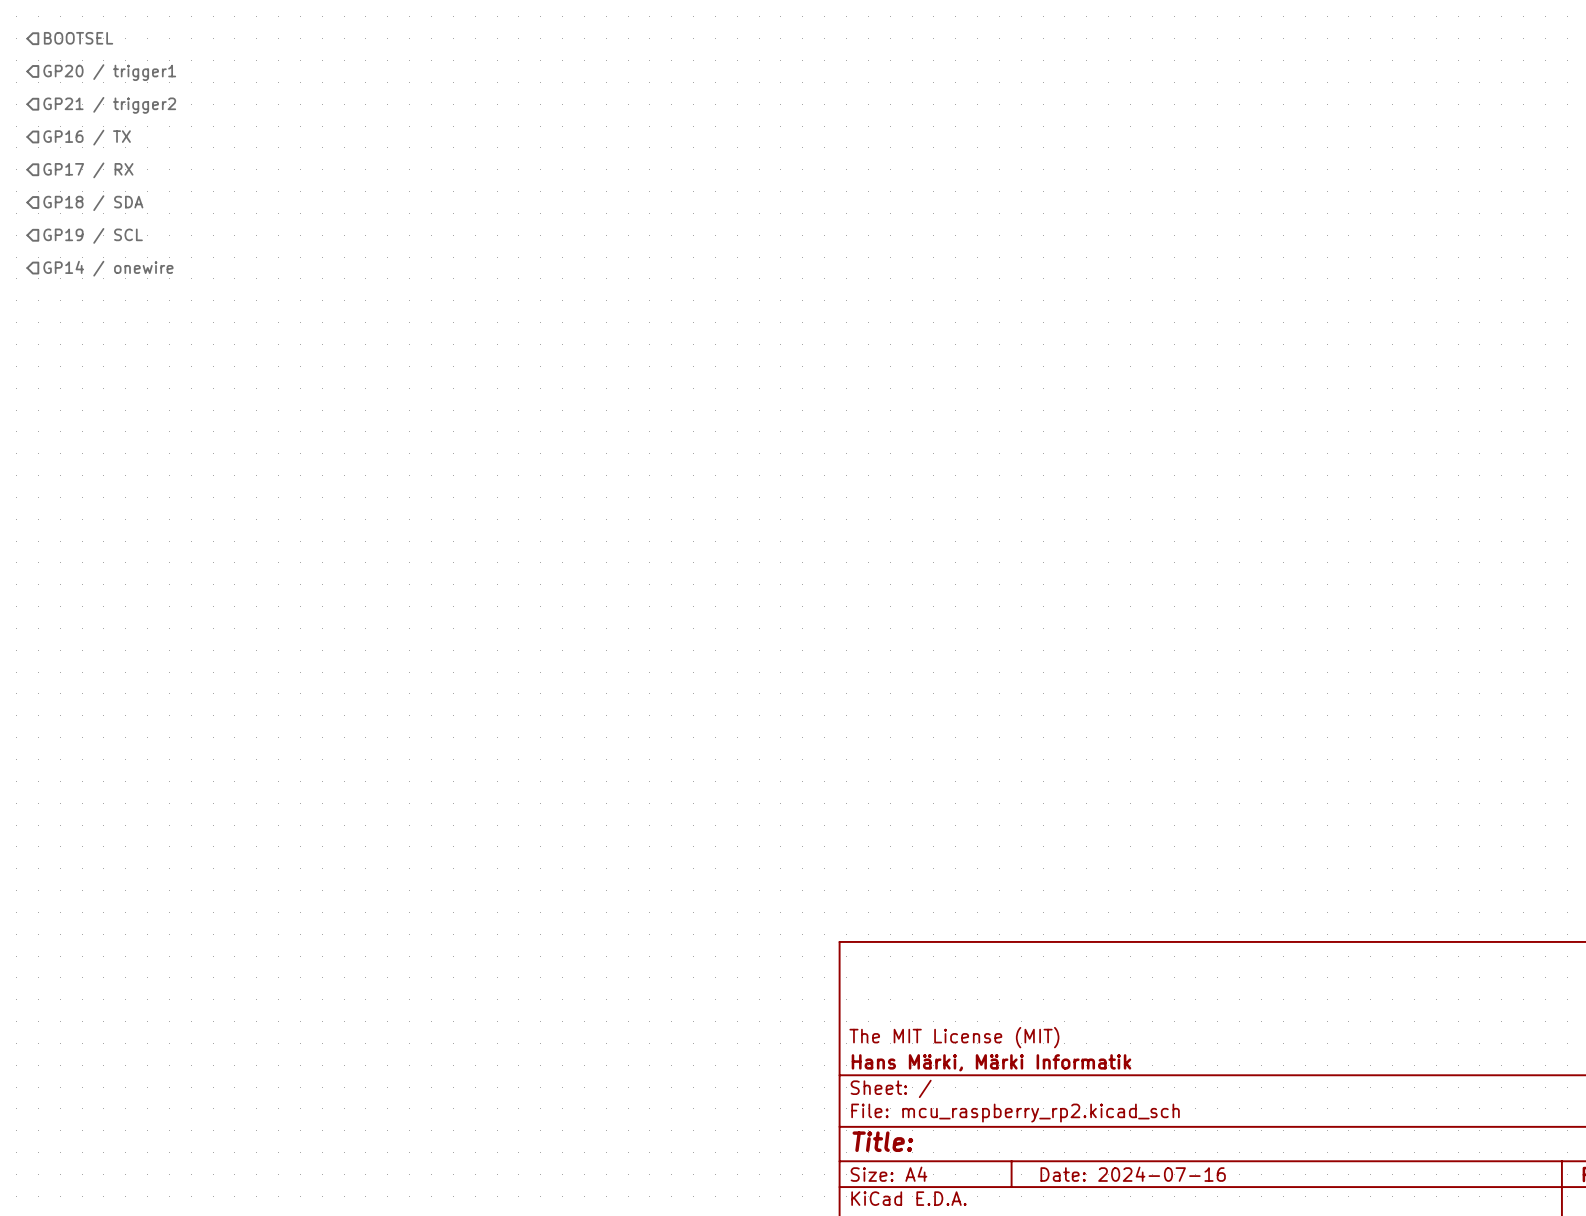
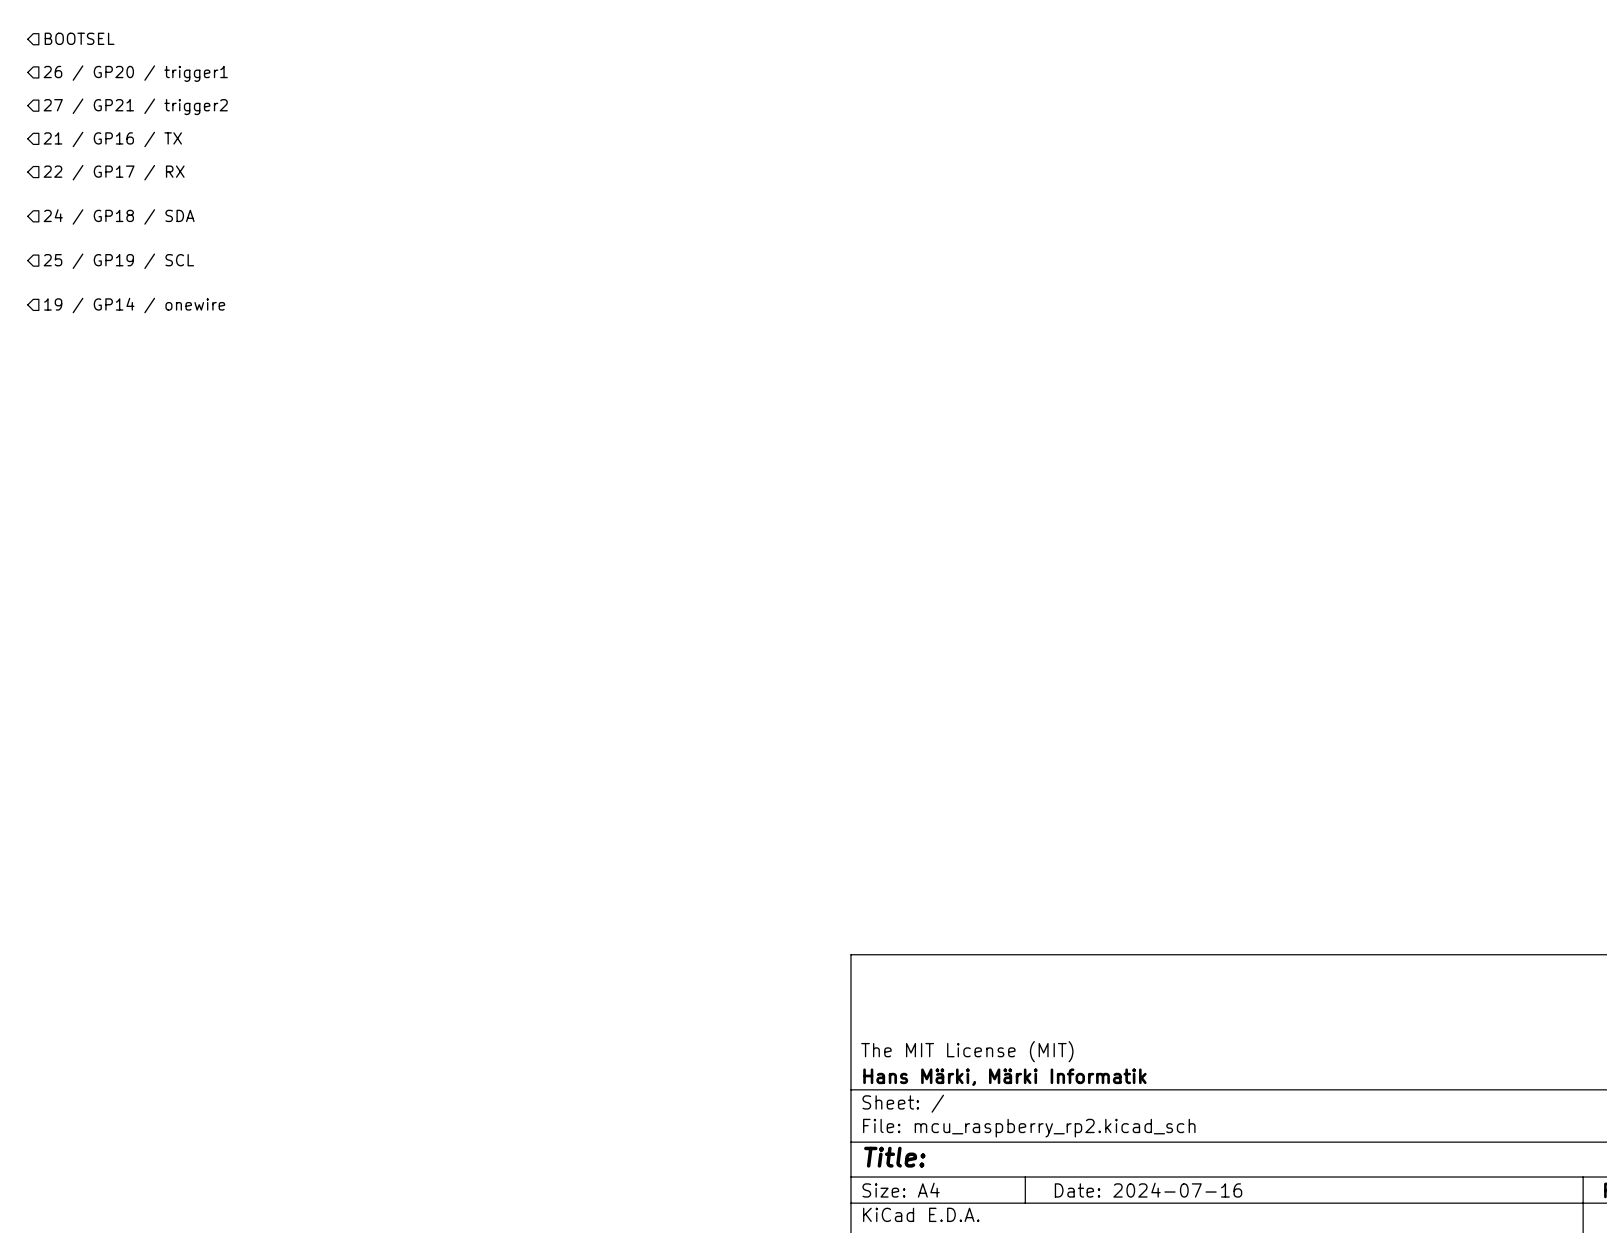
hierarchical label: GP20 / trigger1 (109, 72) -> 26 / GP20 / trigger1 (135, 73)
hierarchical label: GP21 / trigger2 (109, 105) -> 27 / GP21 / trigger2 (135, 106)
hierarchical label: GP16 / TX (87, 137) -> 21 / GP16 / TX (112, 139)
hierarchical label: GP17 / RX (88, 170) -> 22 / GP17 / RX (114, 172)
hierarchical label: GP18 / SDA (93, 203) -> 24 / GP18 / SDA (119, 216)
hierarchical label: GP19 / SCL (93, 235) -> 25 / GP19 / SCL (118, 261)
hierarchical label: GP14 / onewire (108, 268) -> none
hierarchical label: none -> 19 / GP14 / onewire (134, 305)

